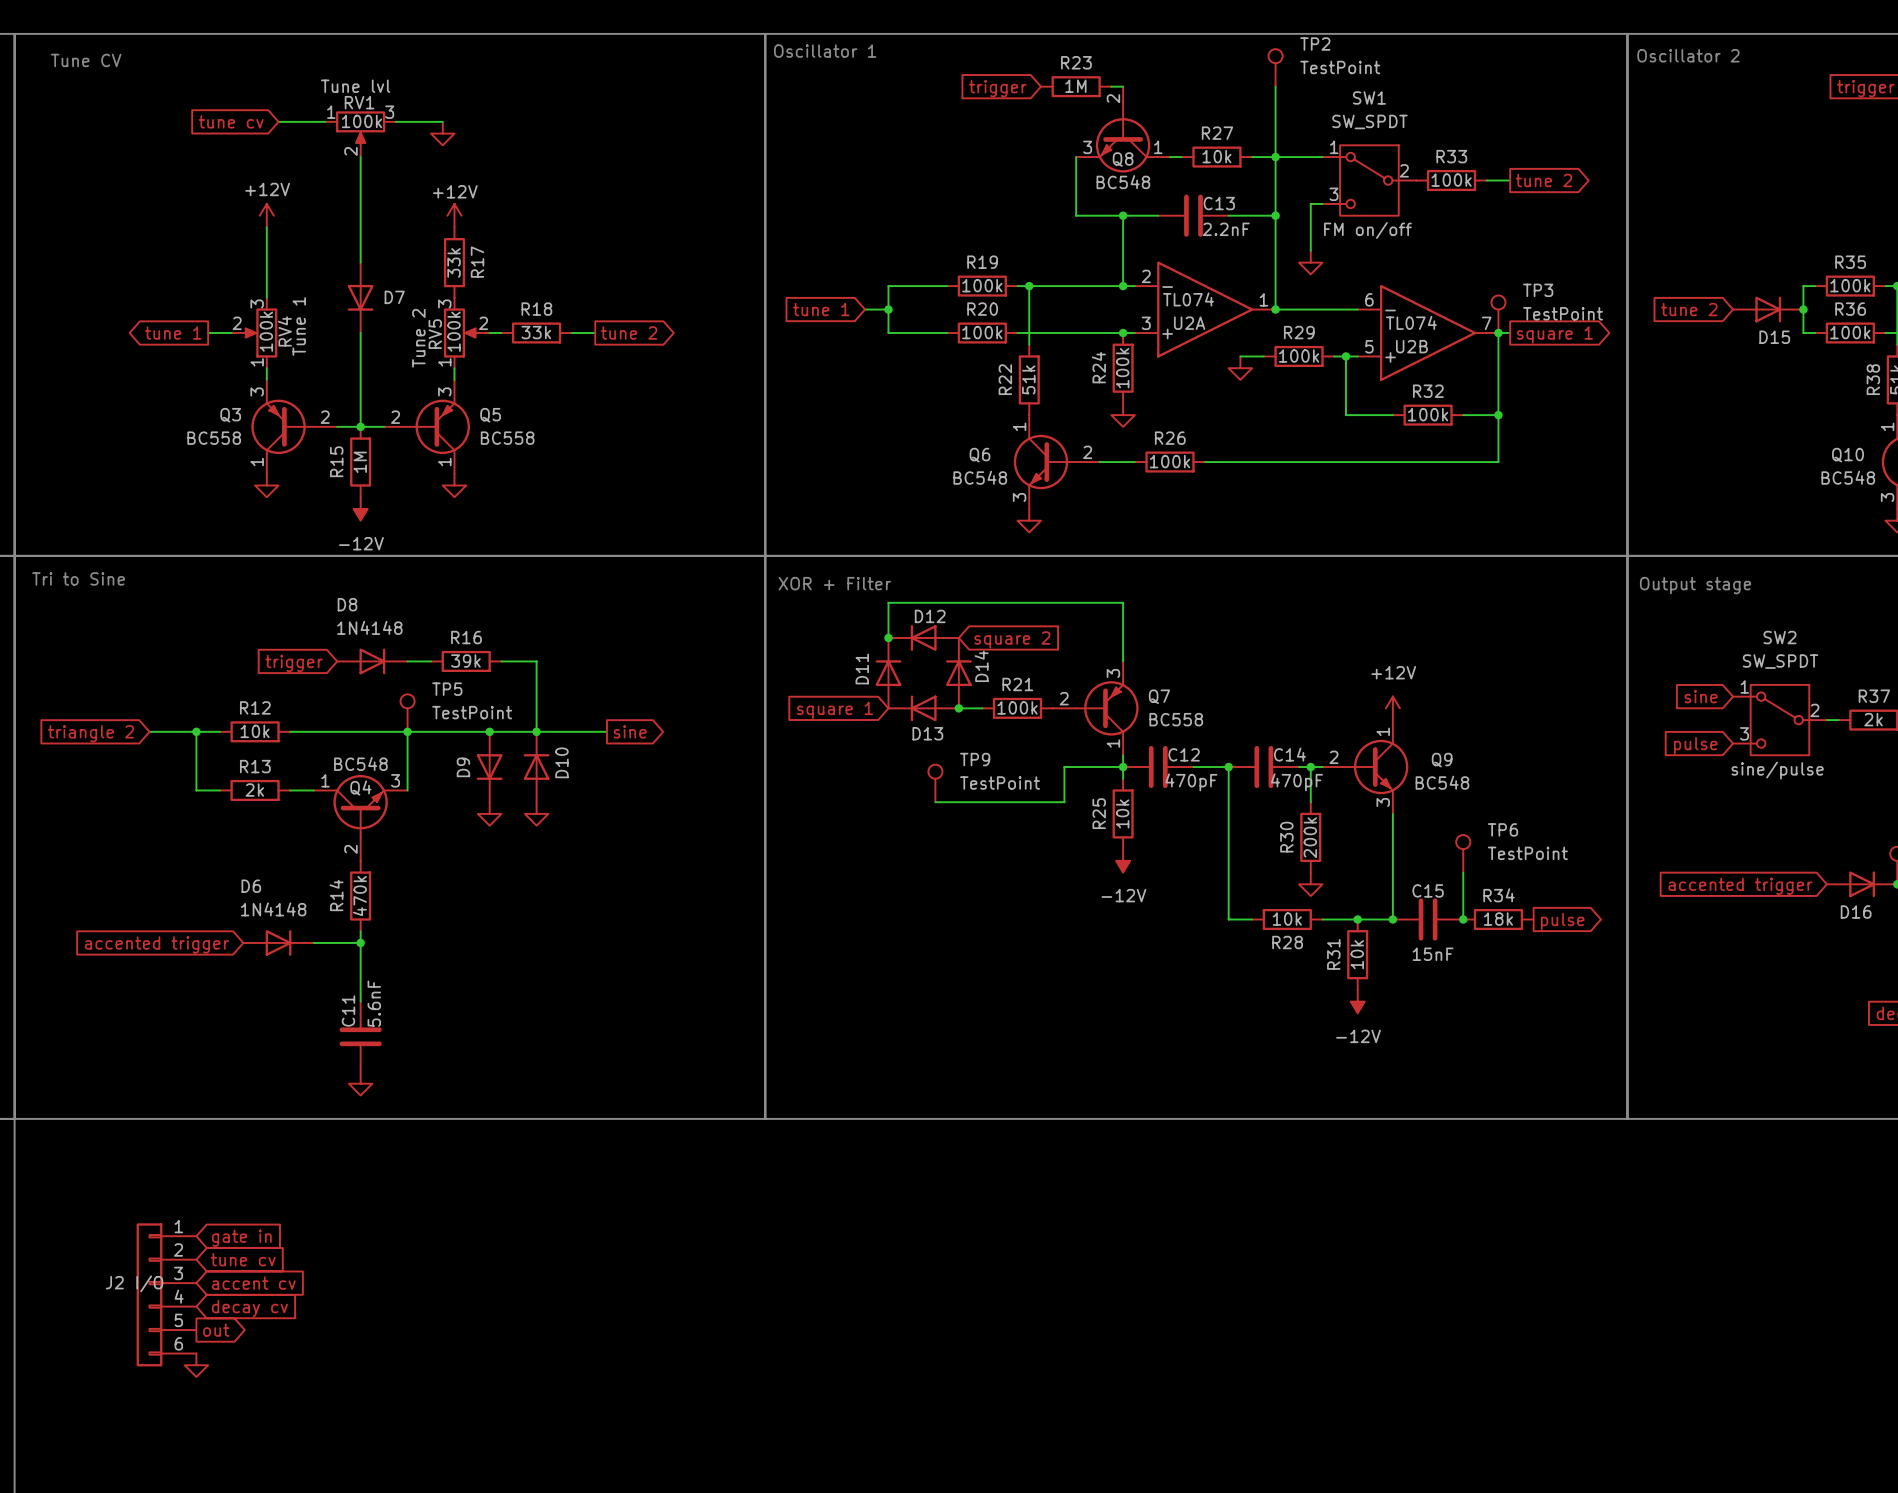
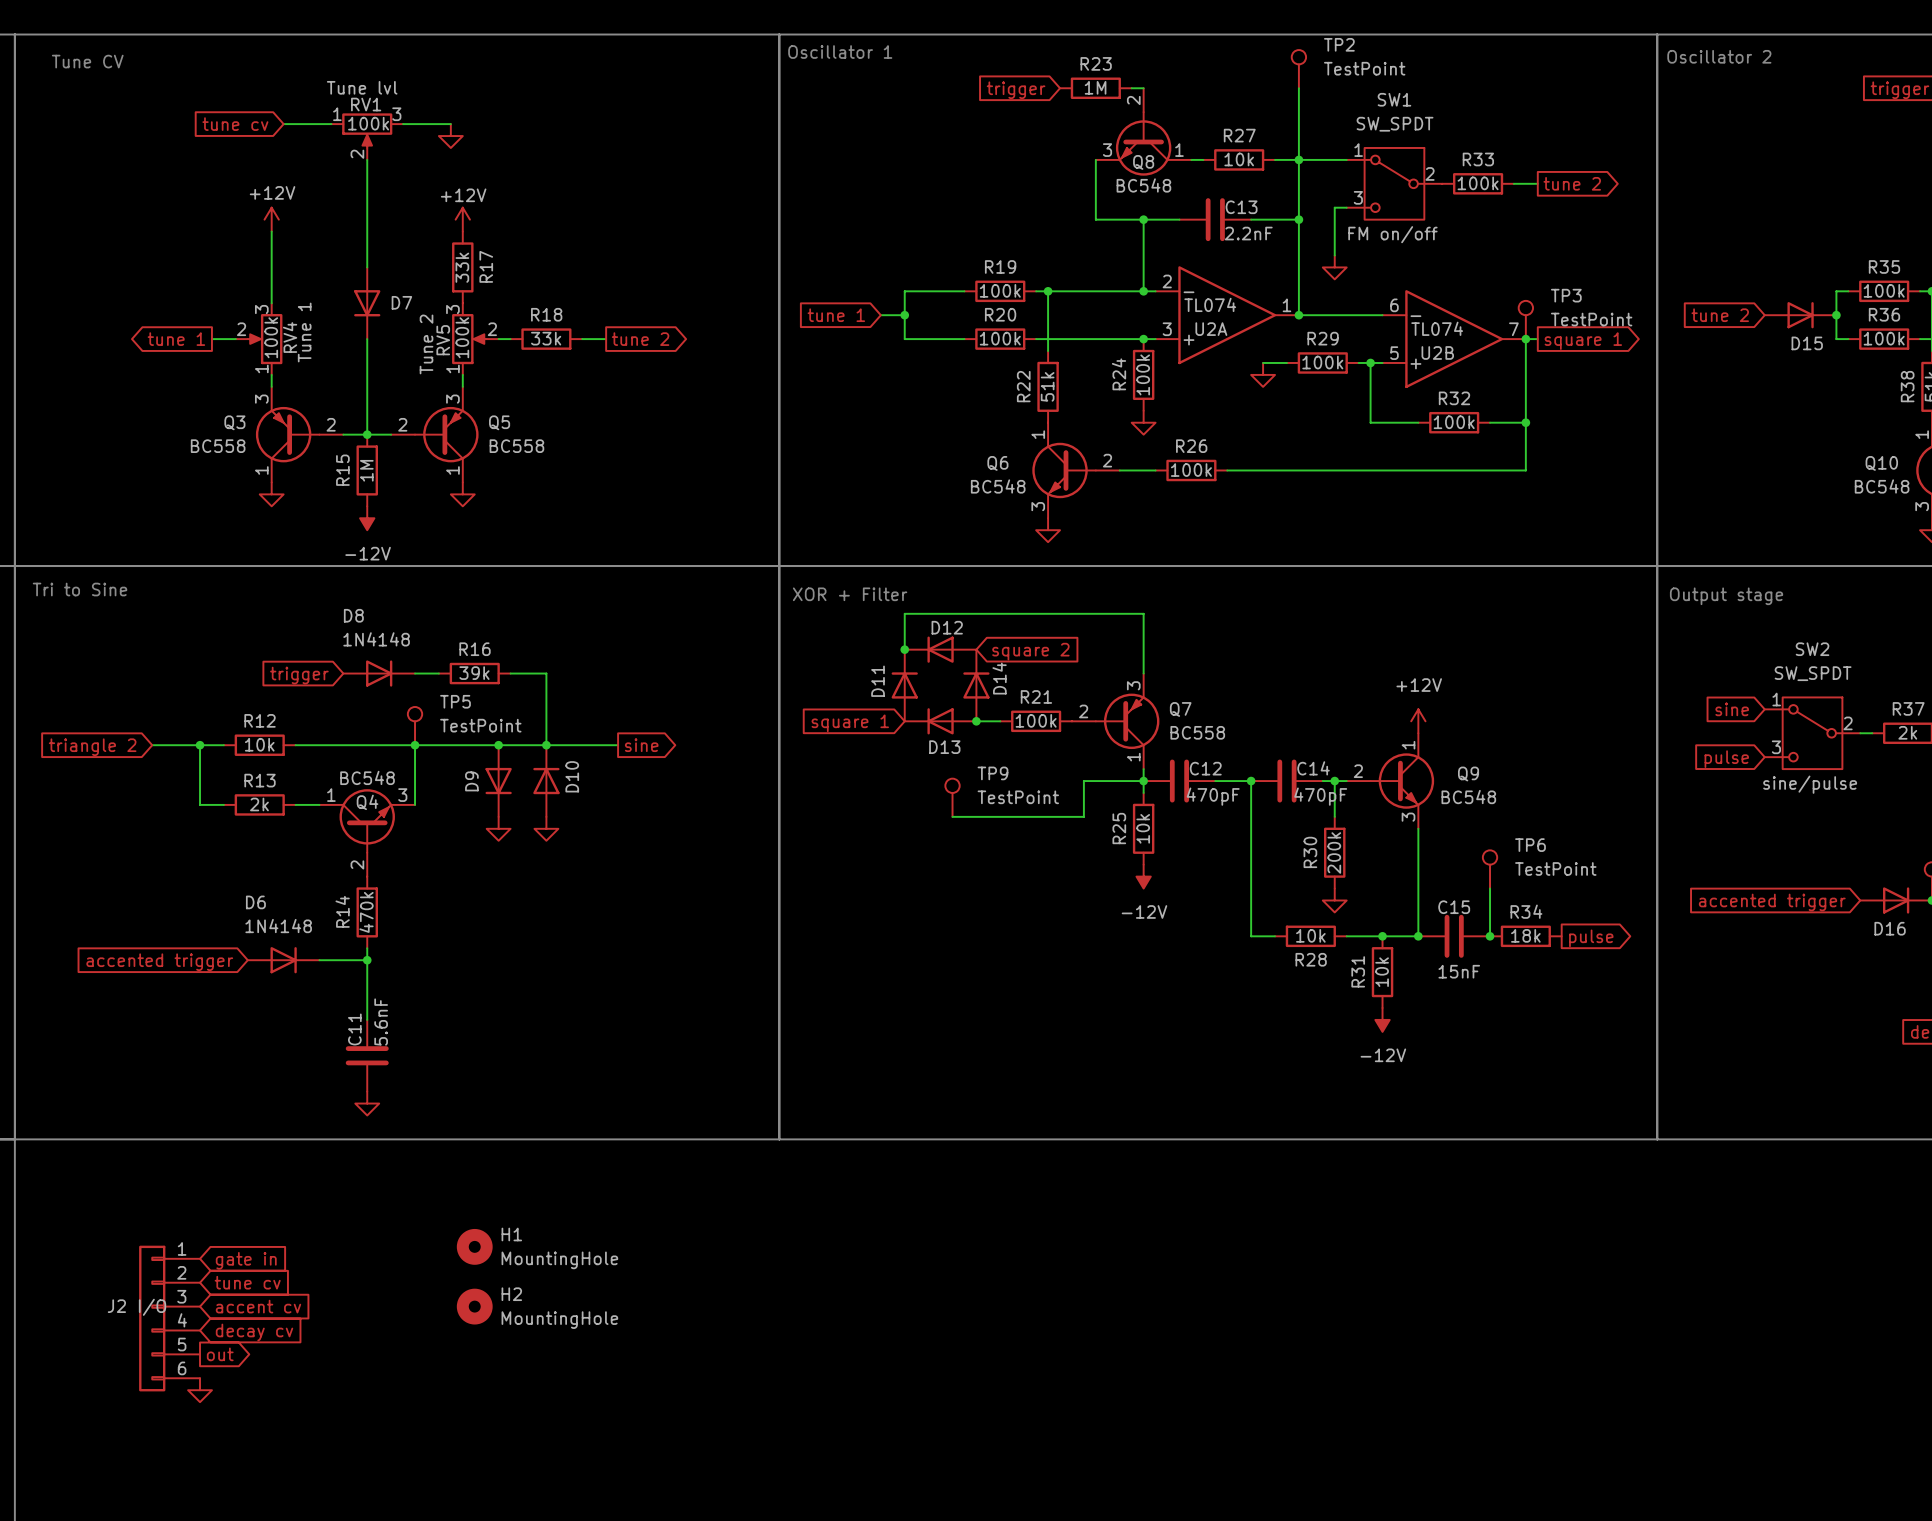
H1: none -> MountingHole (474, 1246)
H2: none -> MountingHole (474, 1306)

